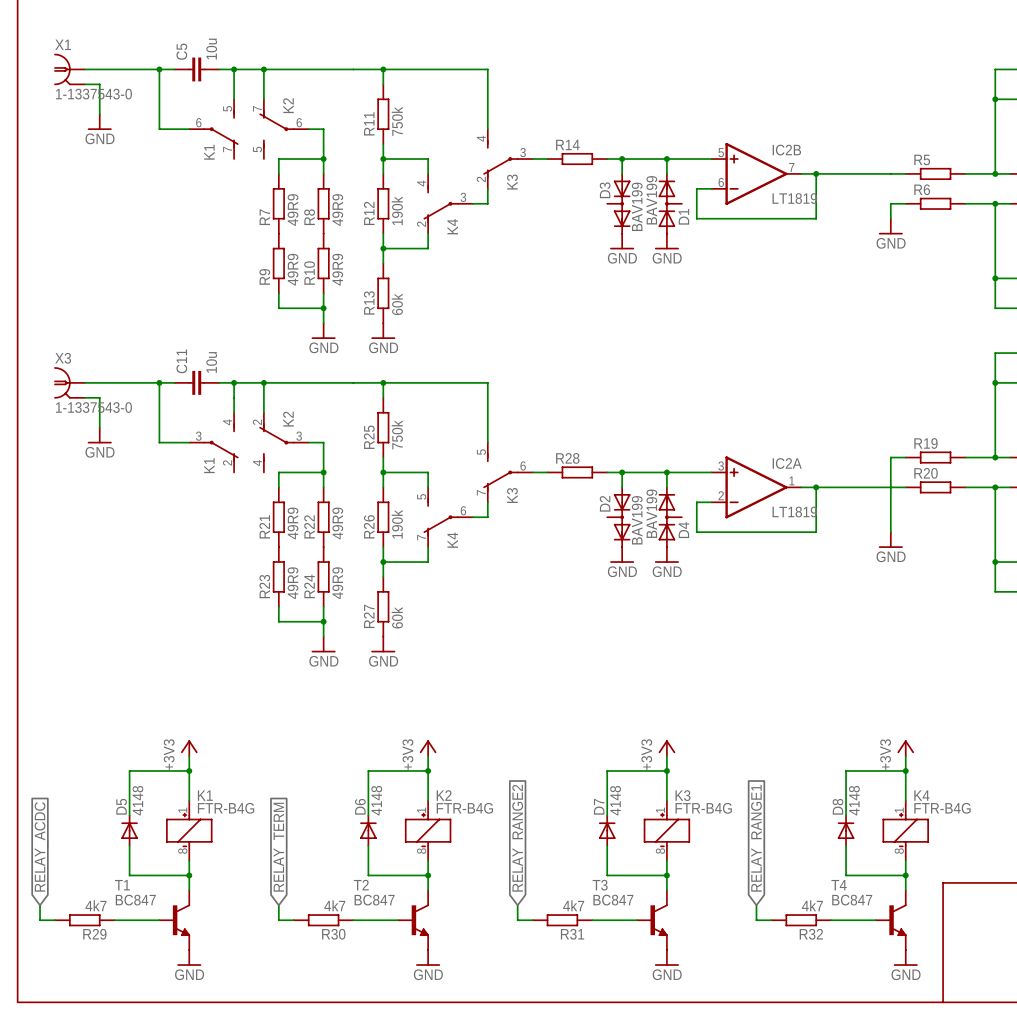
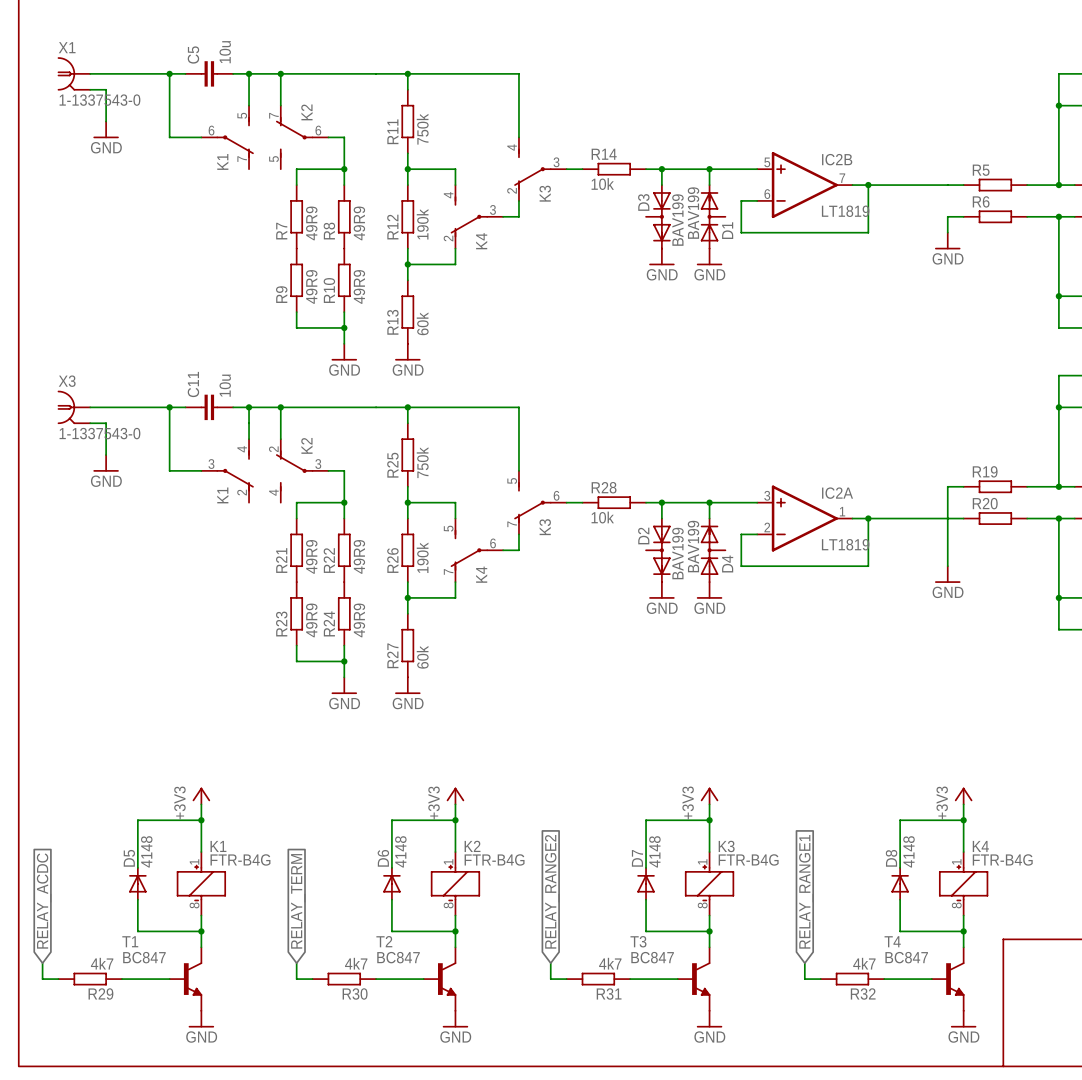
R14 value: none -> 10k (602, 184)
R28 value: none -> 10k (602, 517)

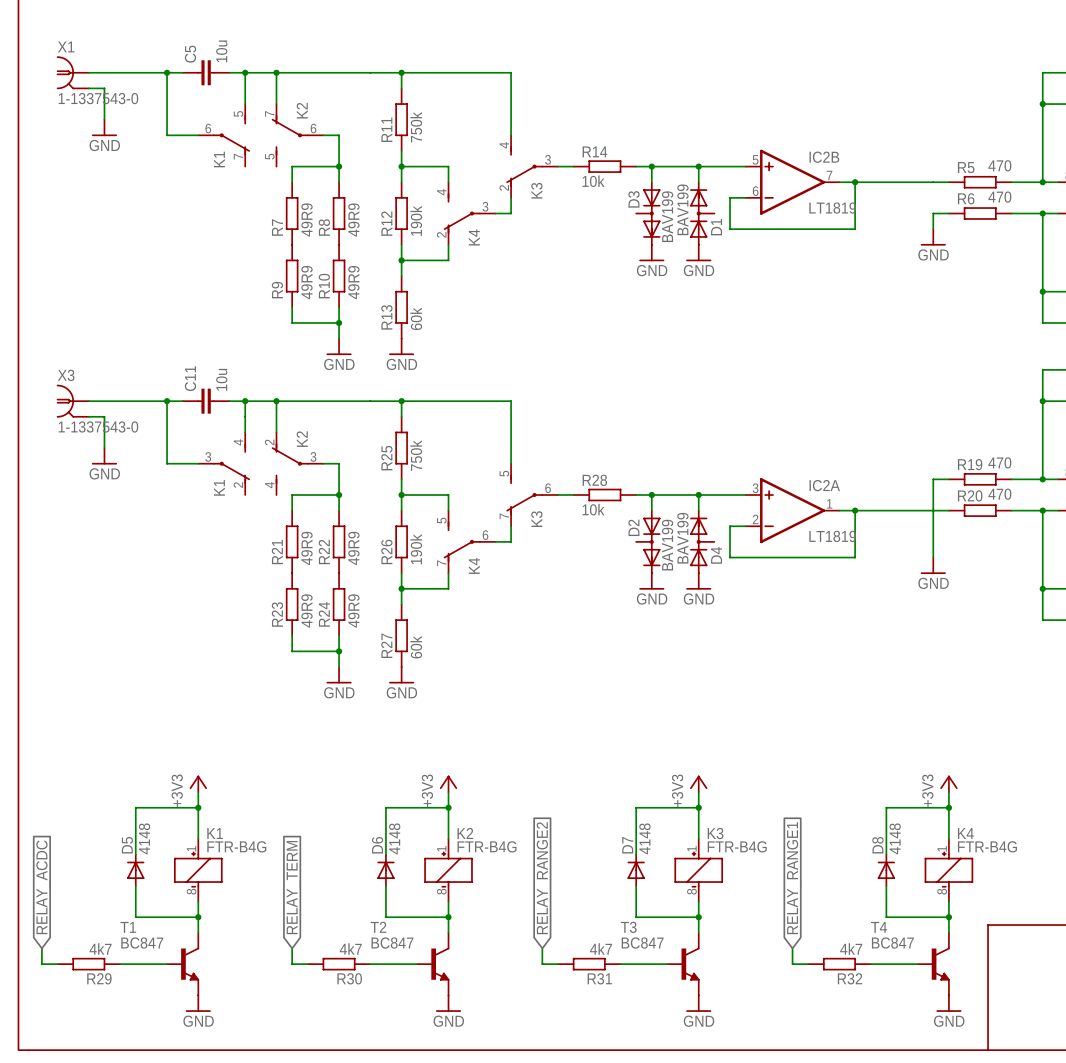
R5 value: none -> 470 (999, 165)
R6 value: none -> 470 (999, 197)
R19 value: none -> 470 (999, 462)
R20 value: none -> 470 (999, 494)

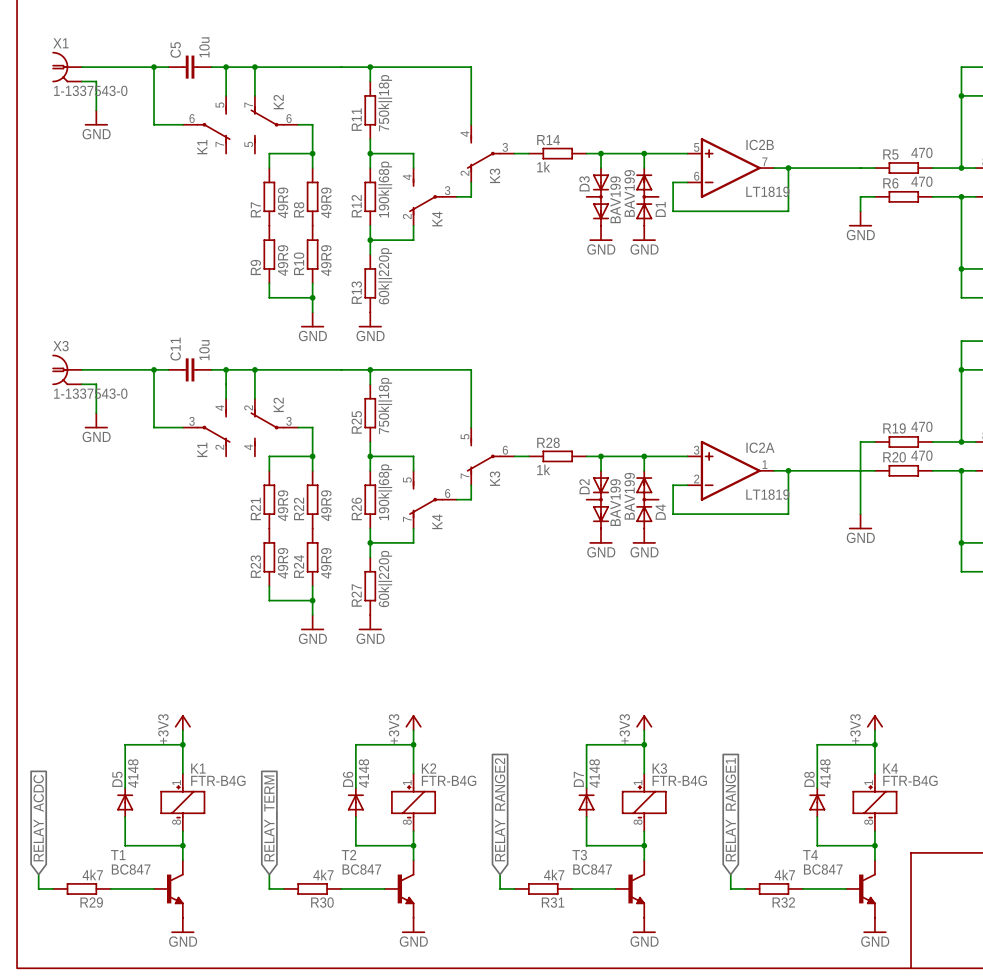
R11 value: 750k (416, 127) -> 750k||18p (385, 103)
R14 value: 10k (593, 181) -> 1k (543, 167)
R12 value: 190k (416, 220) -> 190k||68p (385, 189)
R13 value: 60k (416, 318) -> 60k||220p (385, 276)
R25 value: 750k (416, 455) -> 750k||18p (385, 405)
R28 value: 10k (593, 509) -> 1k (543, 469)
R26 value: 190k (416, 549) -> 190k||68p (385, 492)
R27 value: 60k (416, 647) -> 60k||220p (385, 578)

